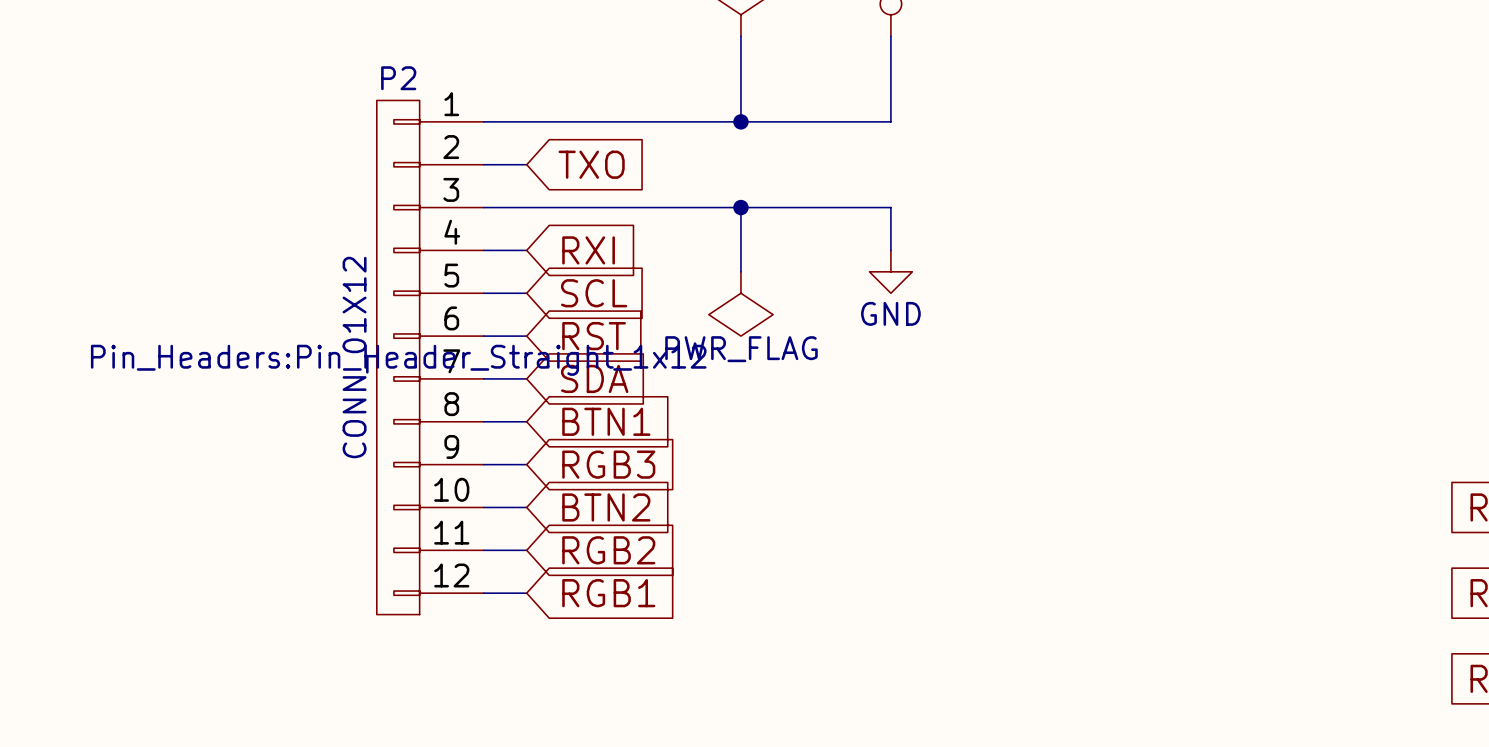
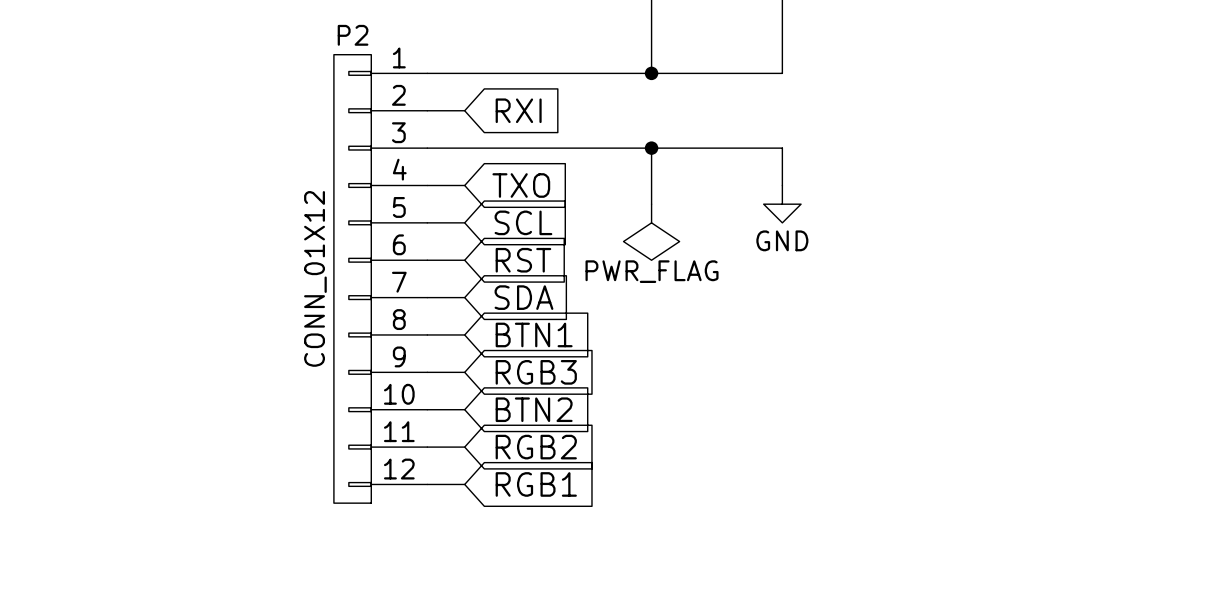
global label: TXO (591, 164) -> RXI (518, 110)
global label: RXI (588, 250) -> TXO (521, 185)
P2 text: Pin_Headers:Pin_Header_Straight_1x12 (398, 360) -> none

